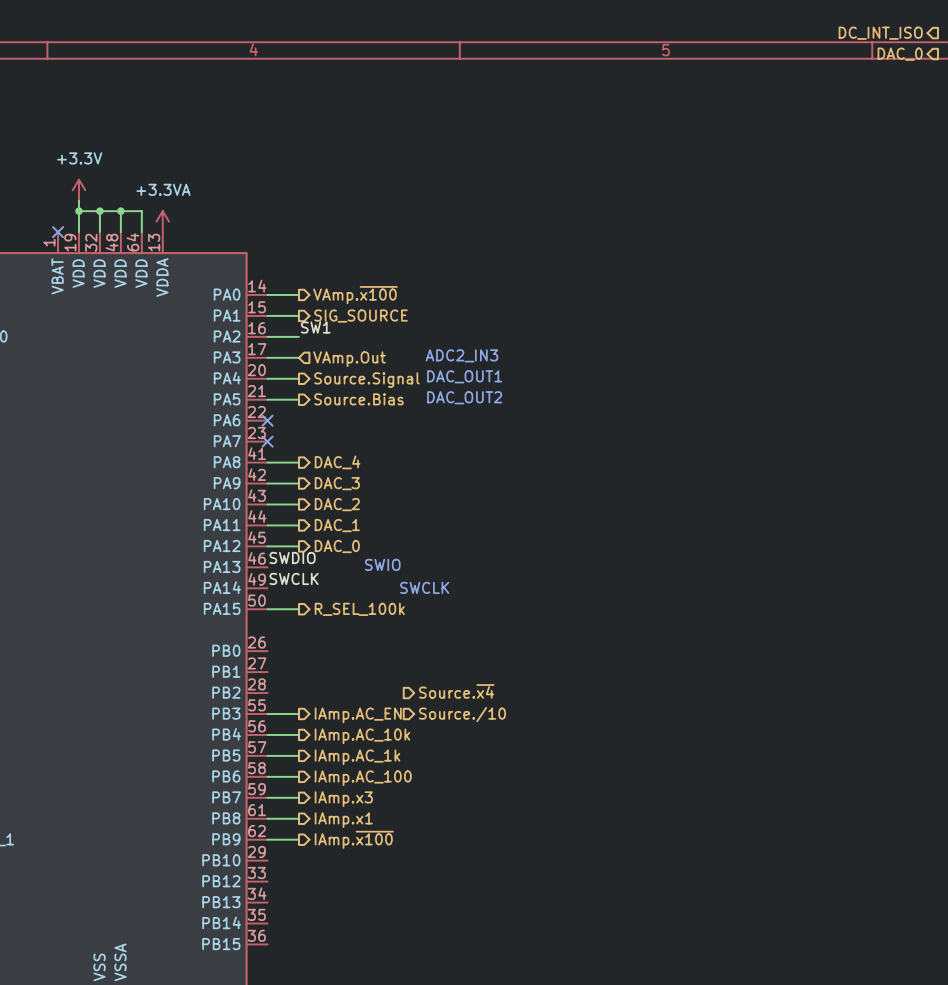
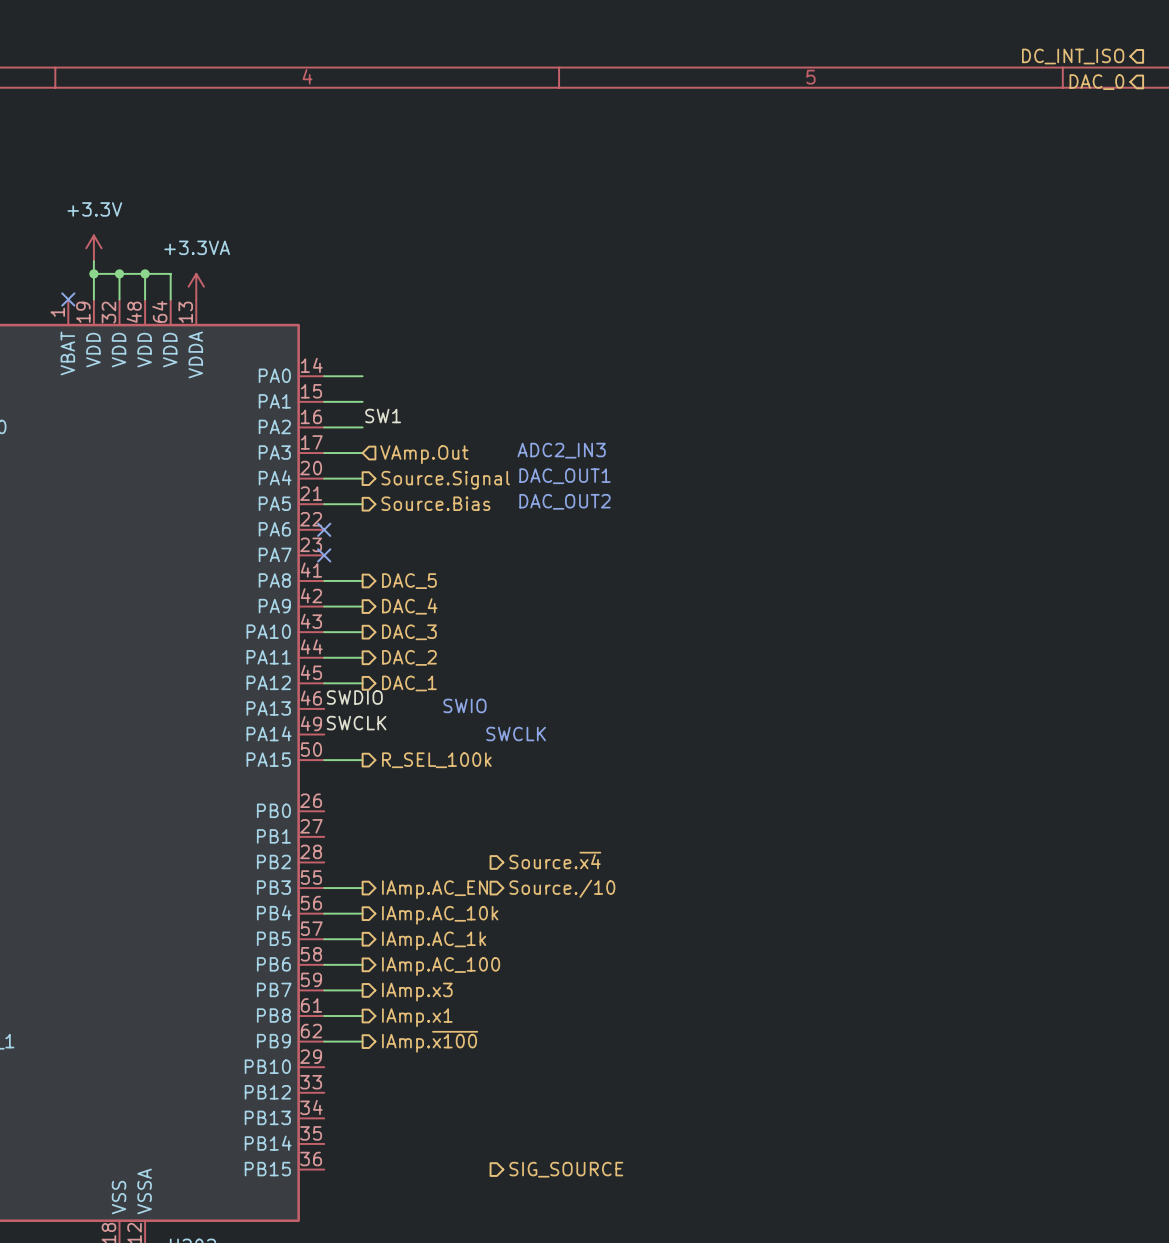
hierarchical label: VAmp.~{x100} (355, 295) -> none
hierarchical label: SIG_SOURCE (360, 316) -> none
hierarchical label: DAC_4 (337, 462) -> DAC_5 (409, 581)
hierarchical label: DAC_3 (337, 483) -> DAC_4 (409, 606)
hierarchical label: DAC_2 (337, 504) -> DAC_3 (409, 632)
hierarchical label: DAC_1 (337, 525) -> DAC_2 (409, 657)
hierarchical label: DAC_0 (337, 546) -> DAC_1 (409, 683)
hierarchical label: none -> SIG_SOURCE (566, 1169)

